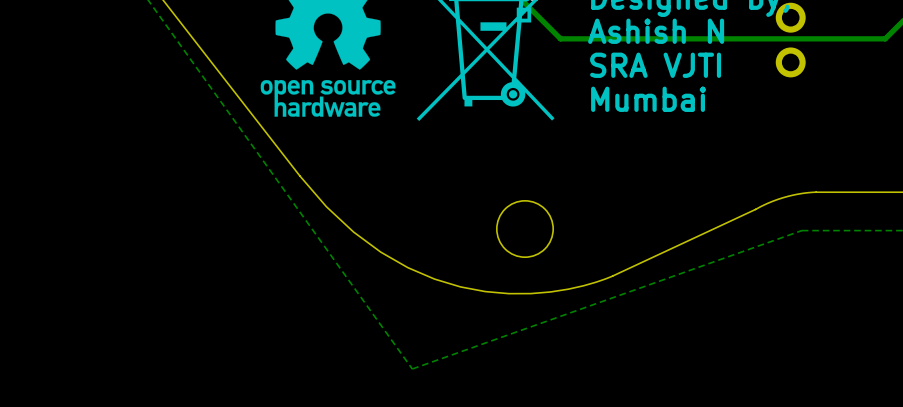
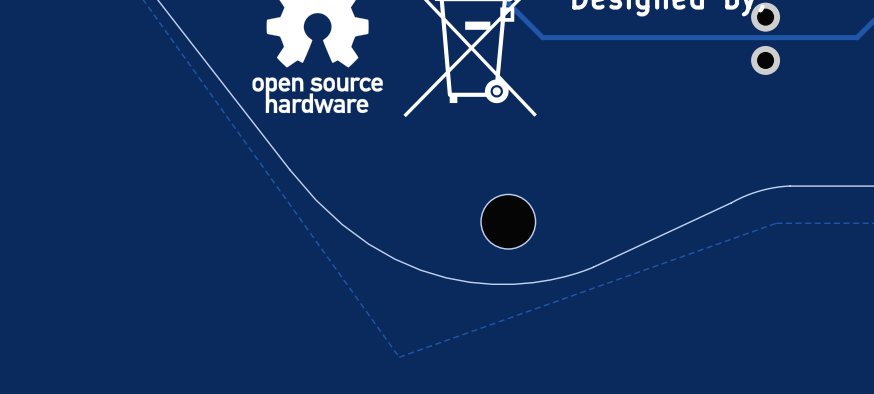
text: Ashish N (656, 31) -> none
text: SRA VJTI (655, 65) -> none
text: Mumbai (648, 99) -> none

